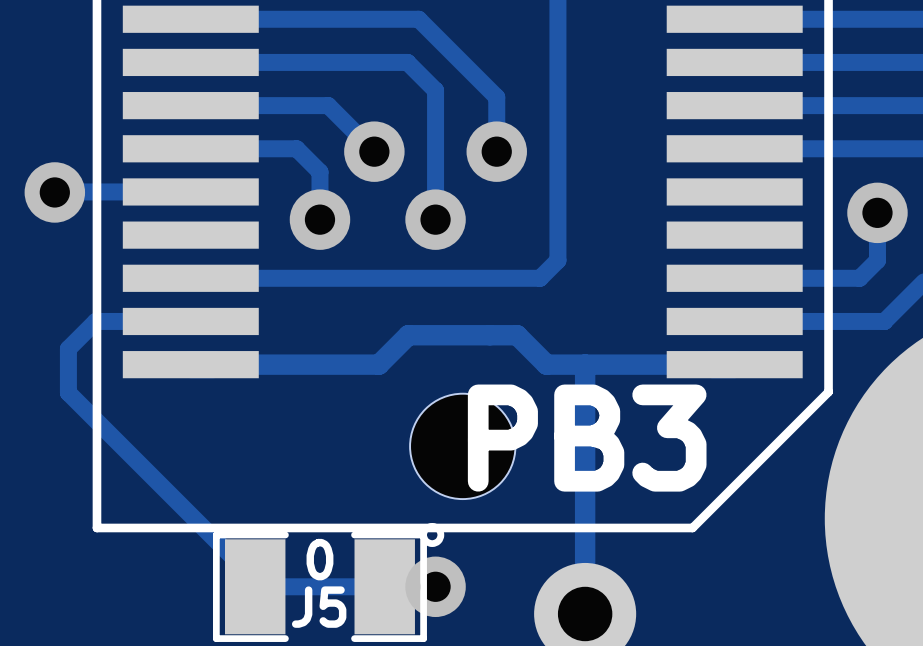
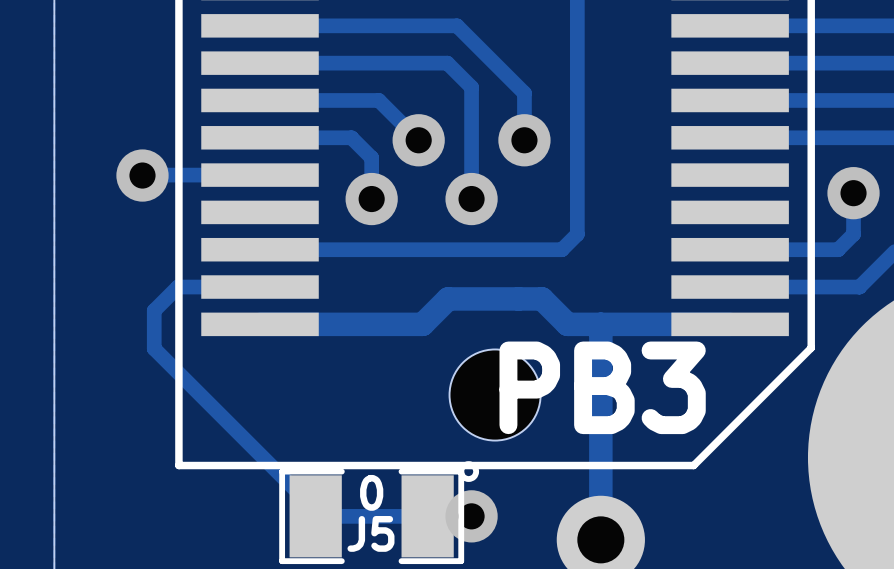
track width: thin (213, 364) (378, 364) (408, 335) (517, 335) (546, 364) (712, 364) -> thick (279, 324) (422, 324) (448, 298) (542, 298) (567, 324) (710, 324)
track width: thin (585, 364) (585, 613) -> thick (600, 324) (600, 539)

